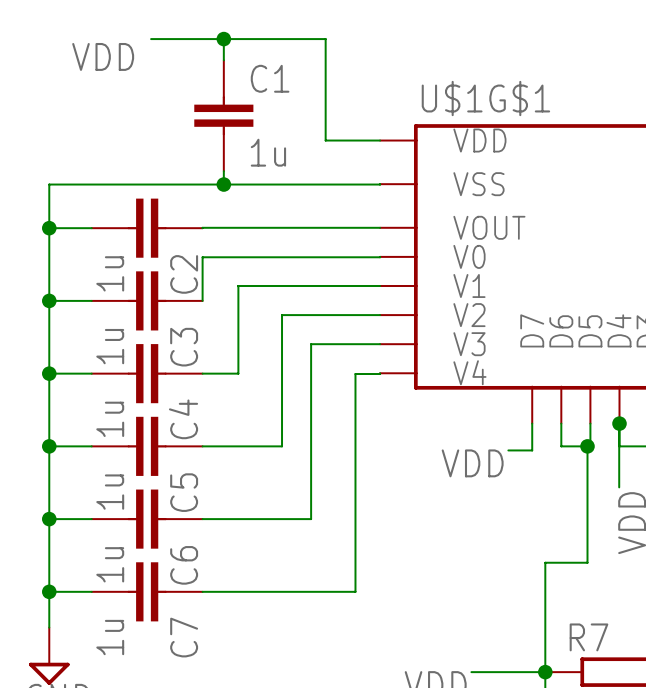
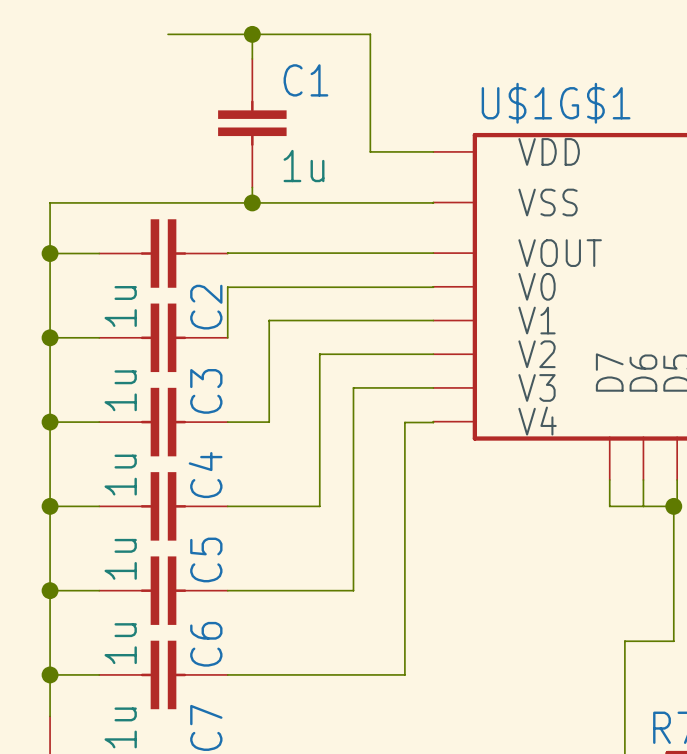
label: VDD (103, 56) -> none
wire: (532, 446) (532, 450) (508, 450) -> (609, 506) (643, 506)
label: VDD (472, 463) -> none

